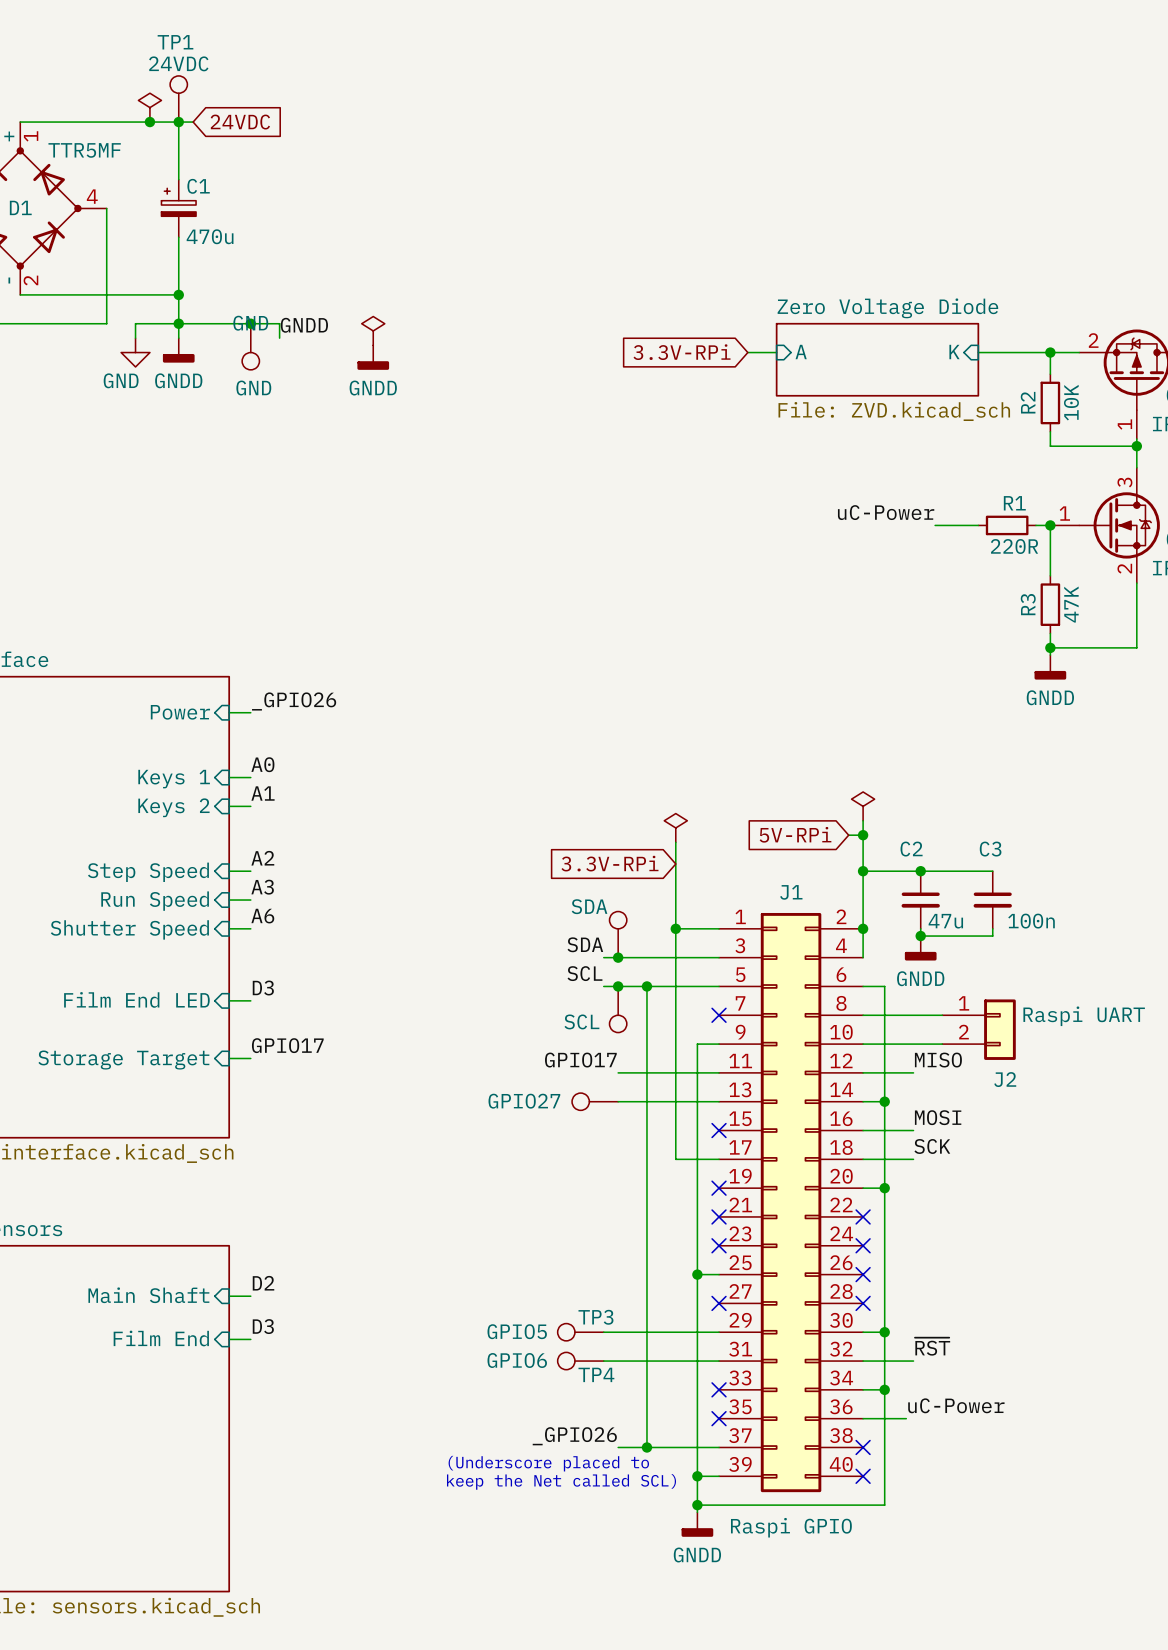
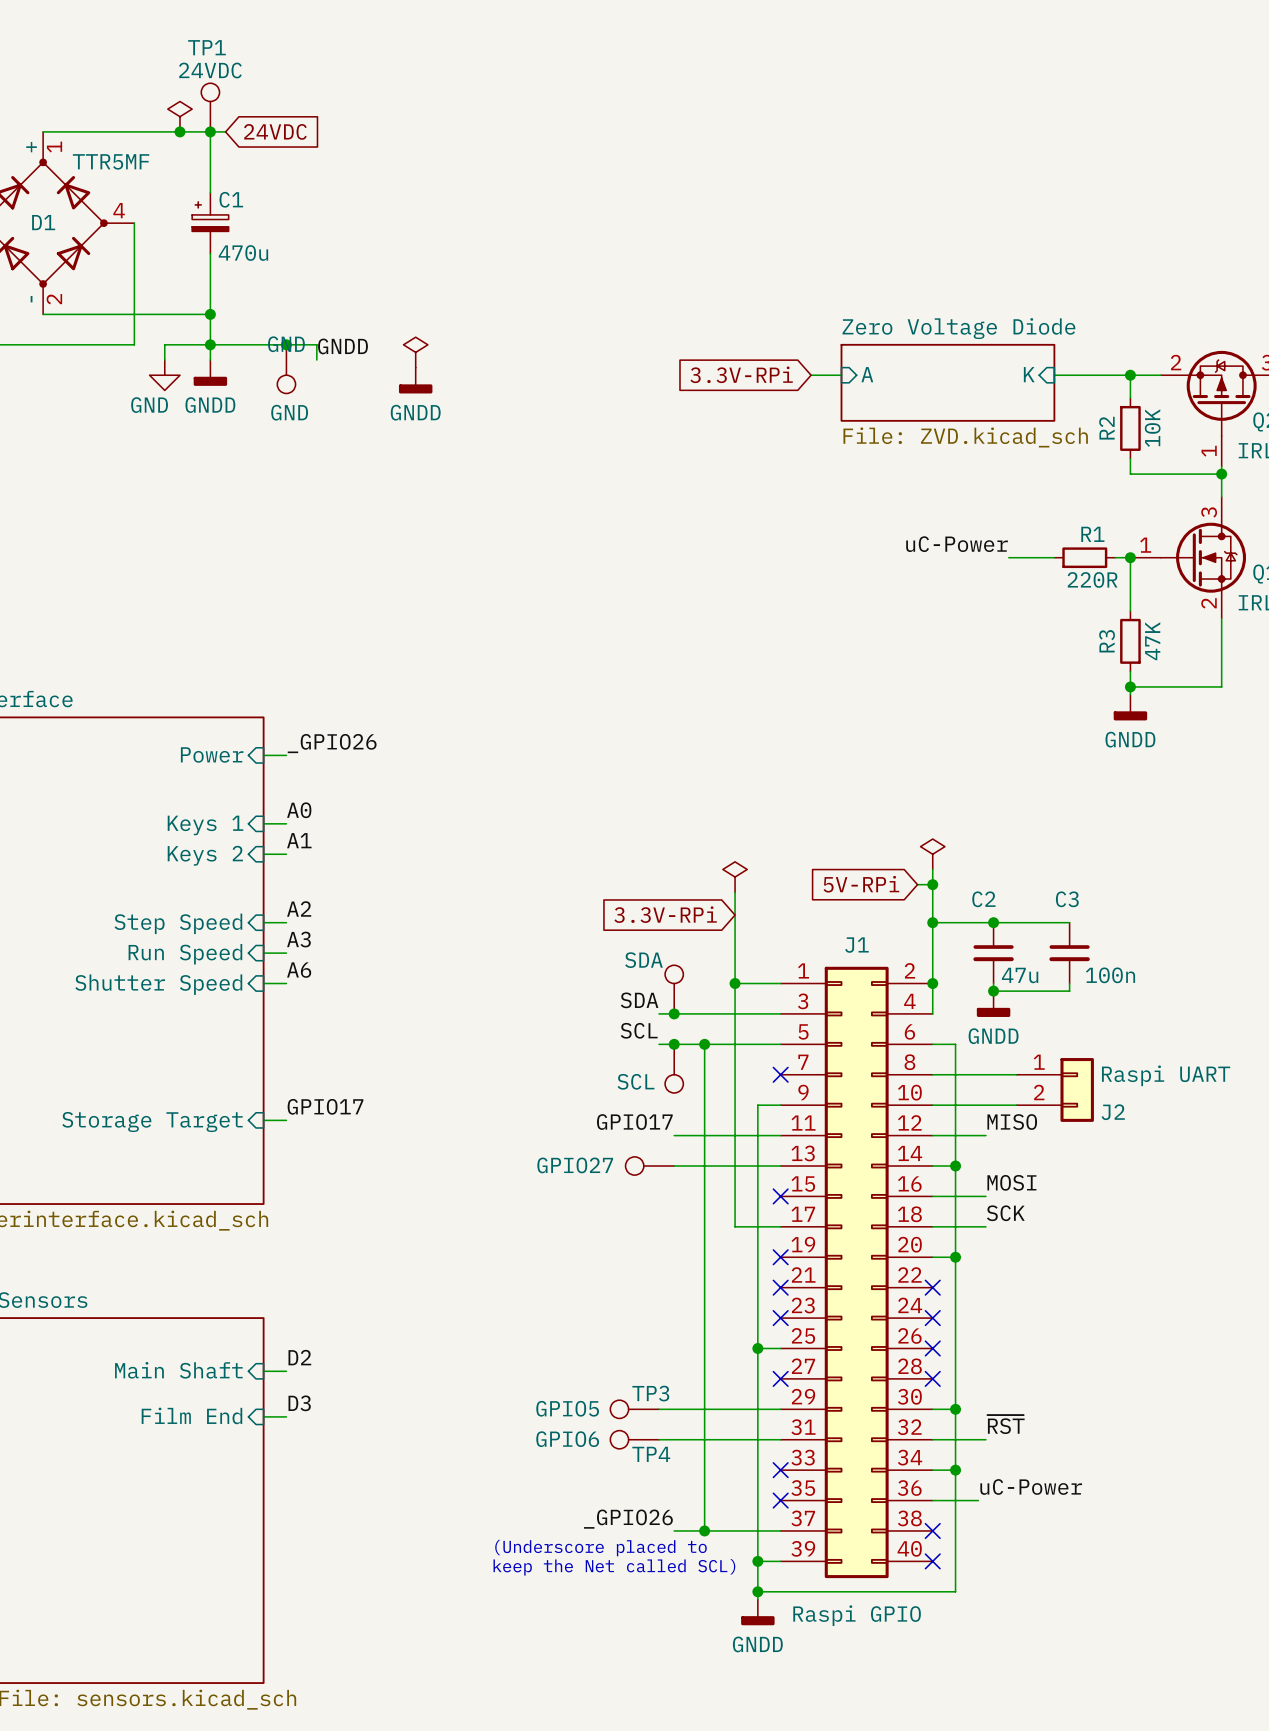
label: D3 (263, 988) -> none
sheet pin: Film End LED (136, 999) -> none
wire: (229, 1000) (250, 1000) -> none
J2 name position: J2 (1005, 1079) -> J2 (1113, 1112)

